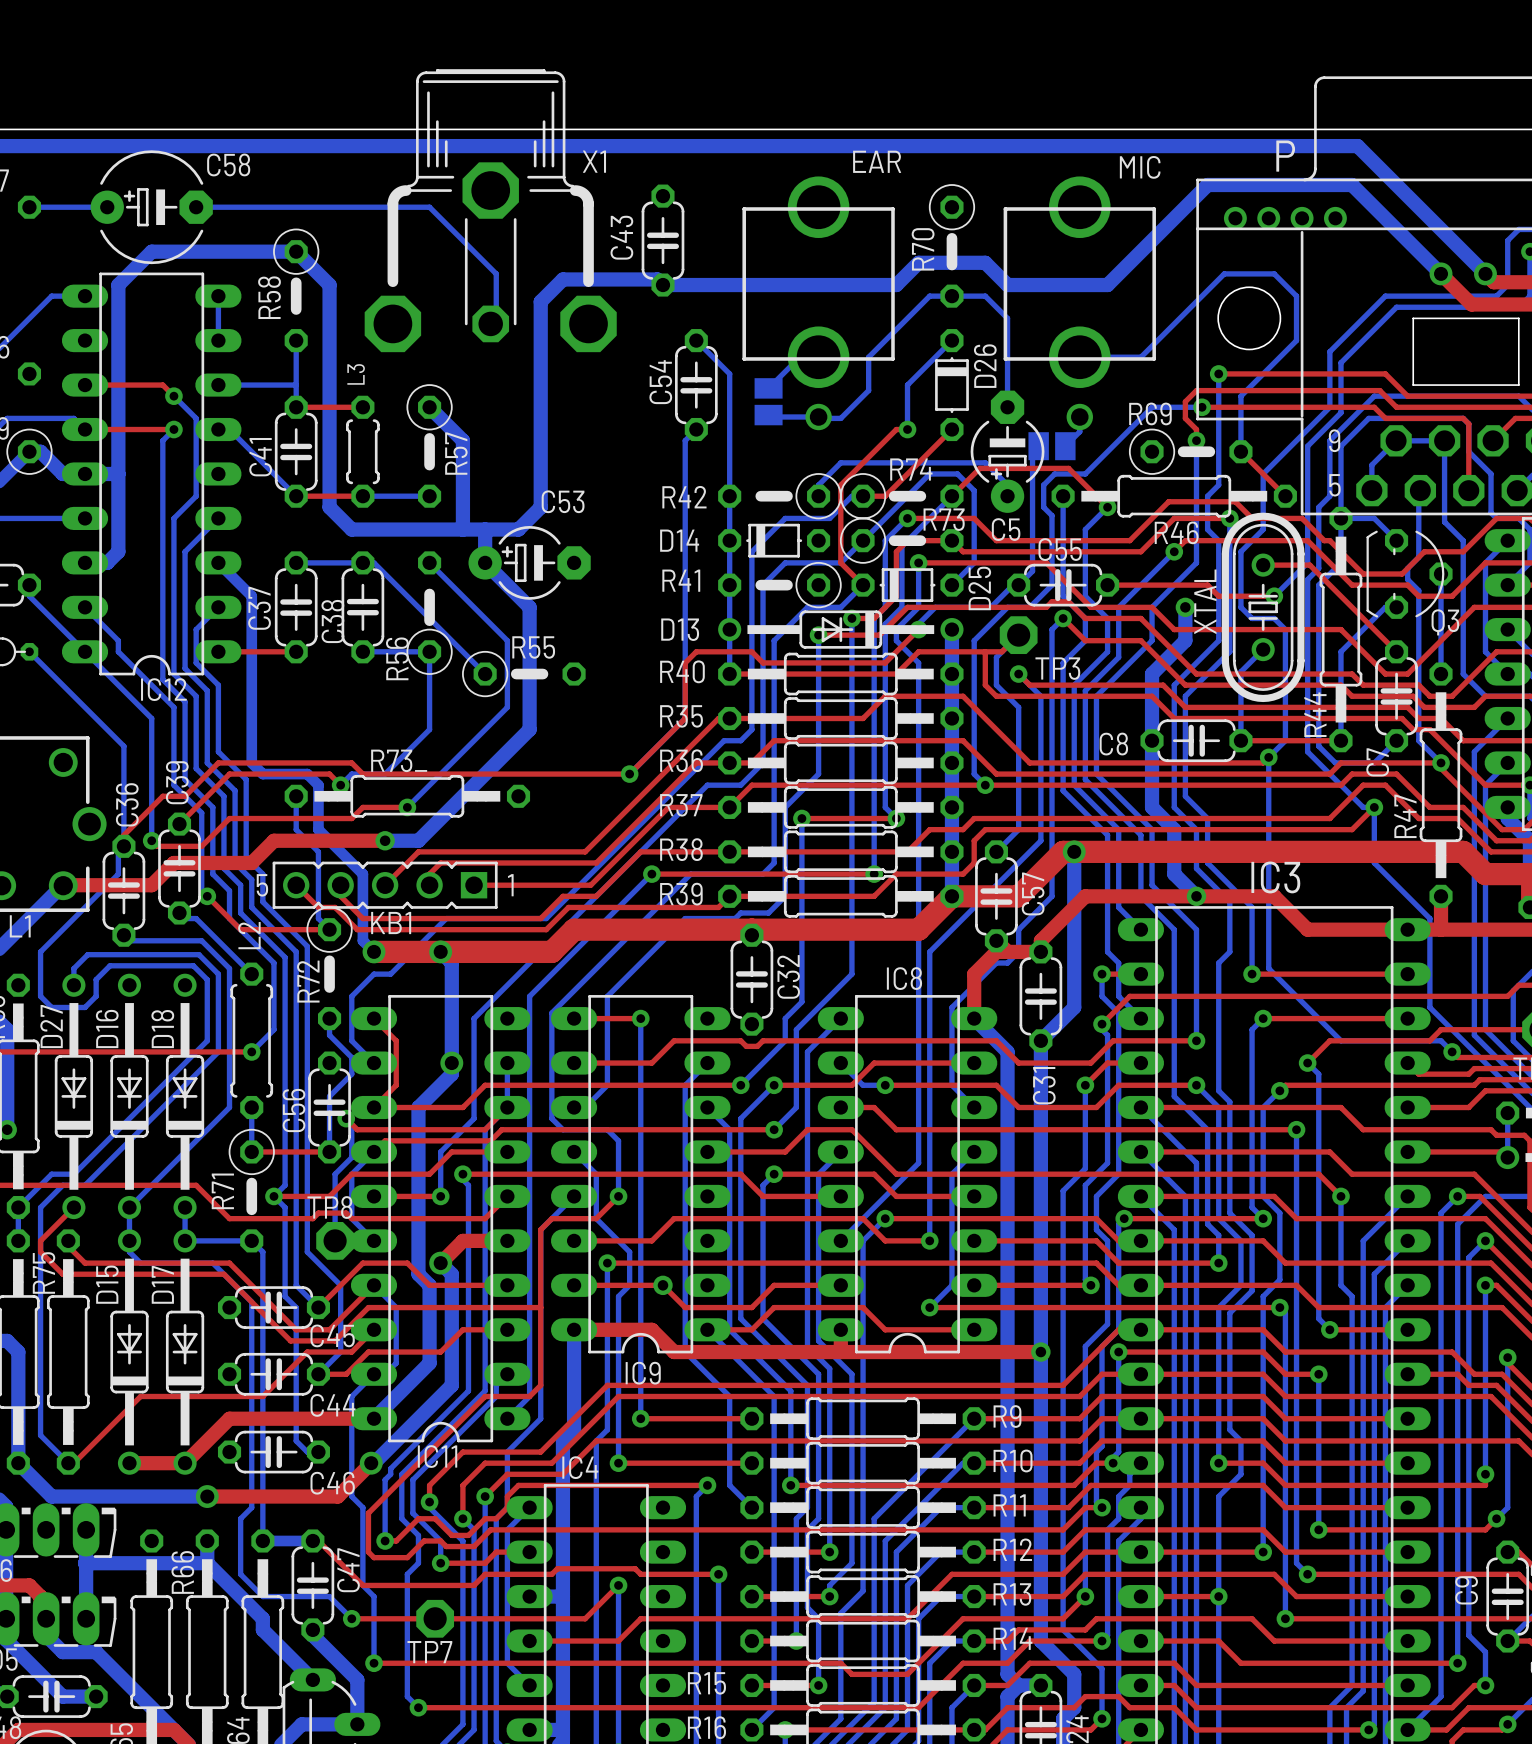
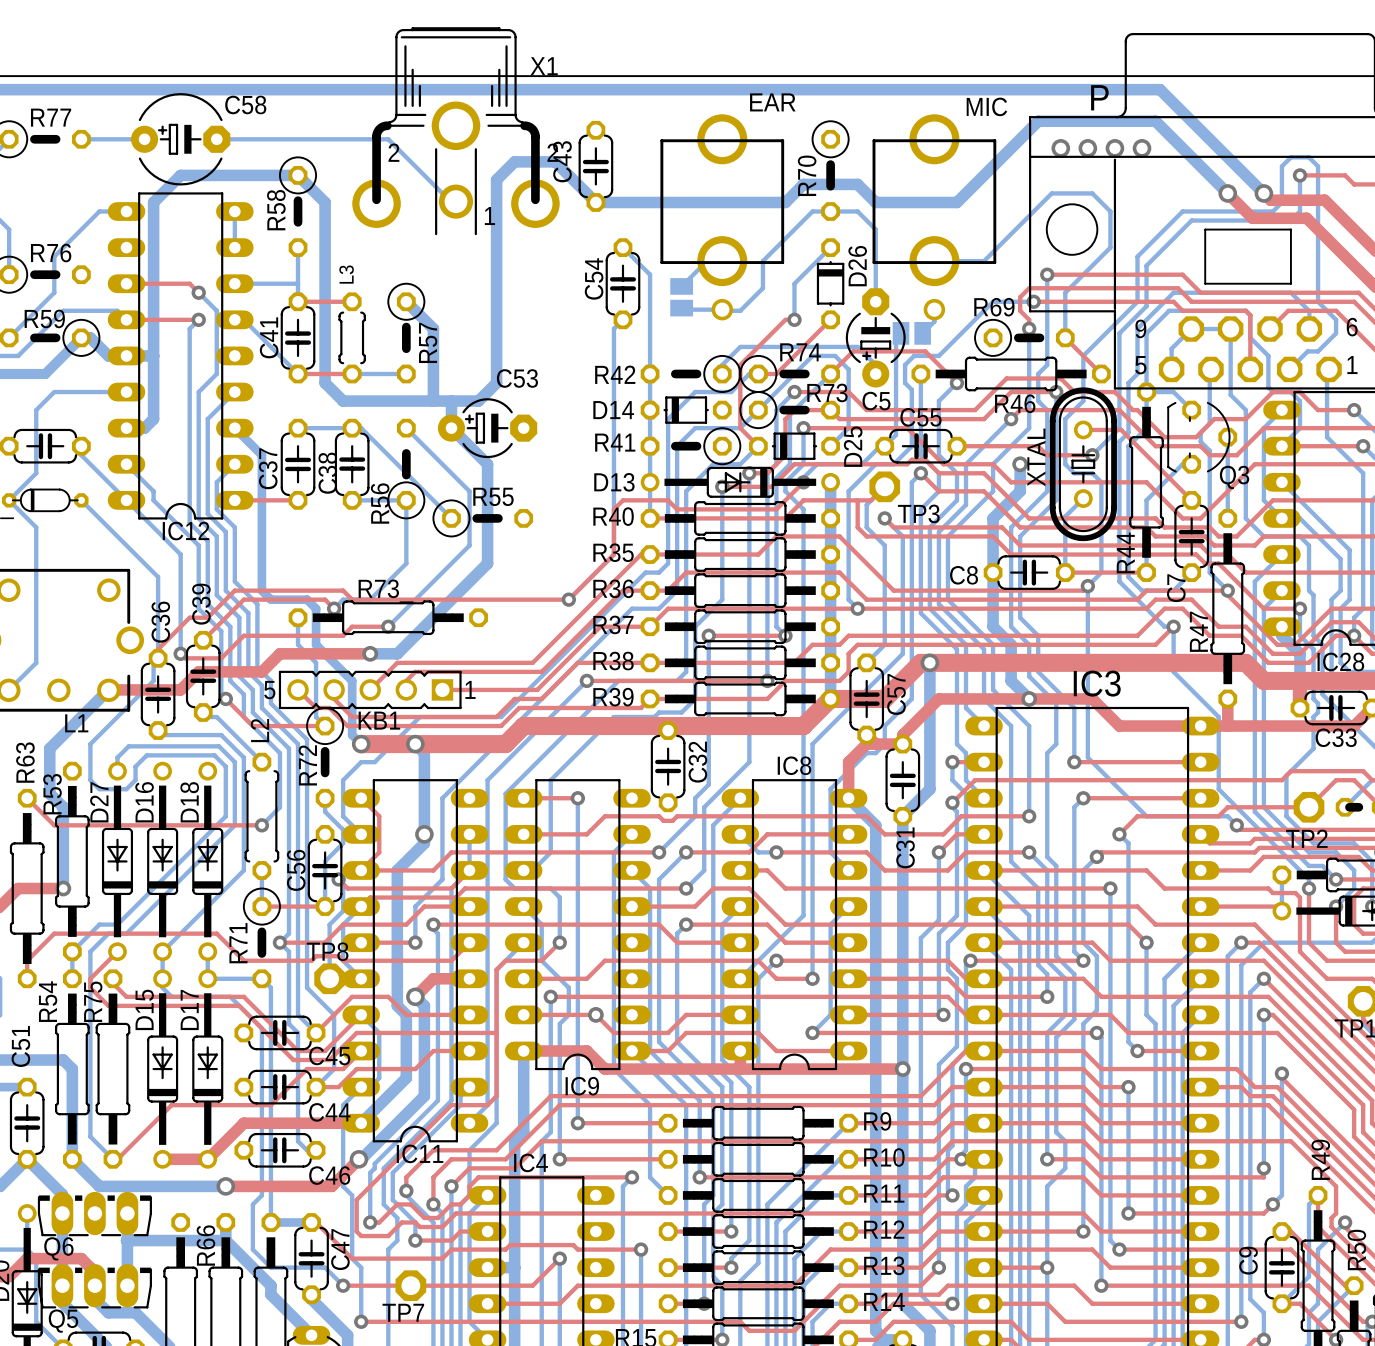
X1 footprint: [364, 69, 617, 353] -> [352, 27, 560, 236]
bottom track: (407, 207) (429, 207) (496, 273) (496, 318) (490, 323) -> (388, 139) (450, 201) (455, 201)
bottom track: (657, 279) (562, 279) (540, 301) -> (591, 197) (555, 161) (514, 161) (496, 179) (496, 216)

